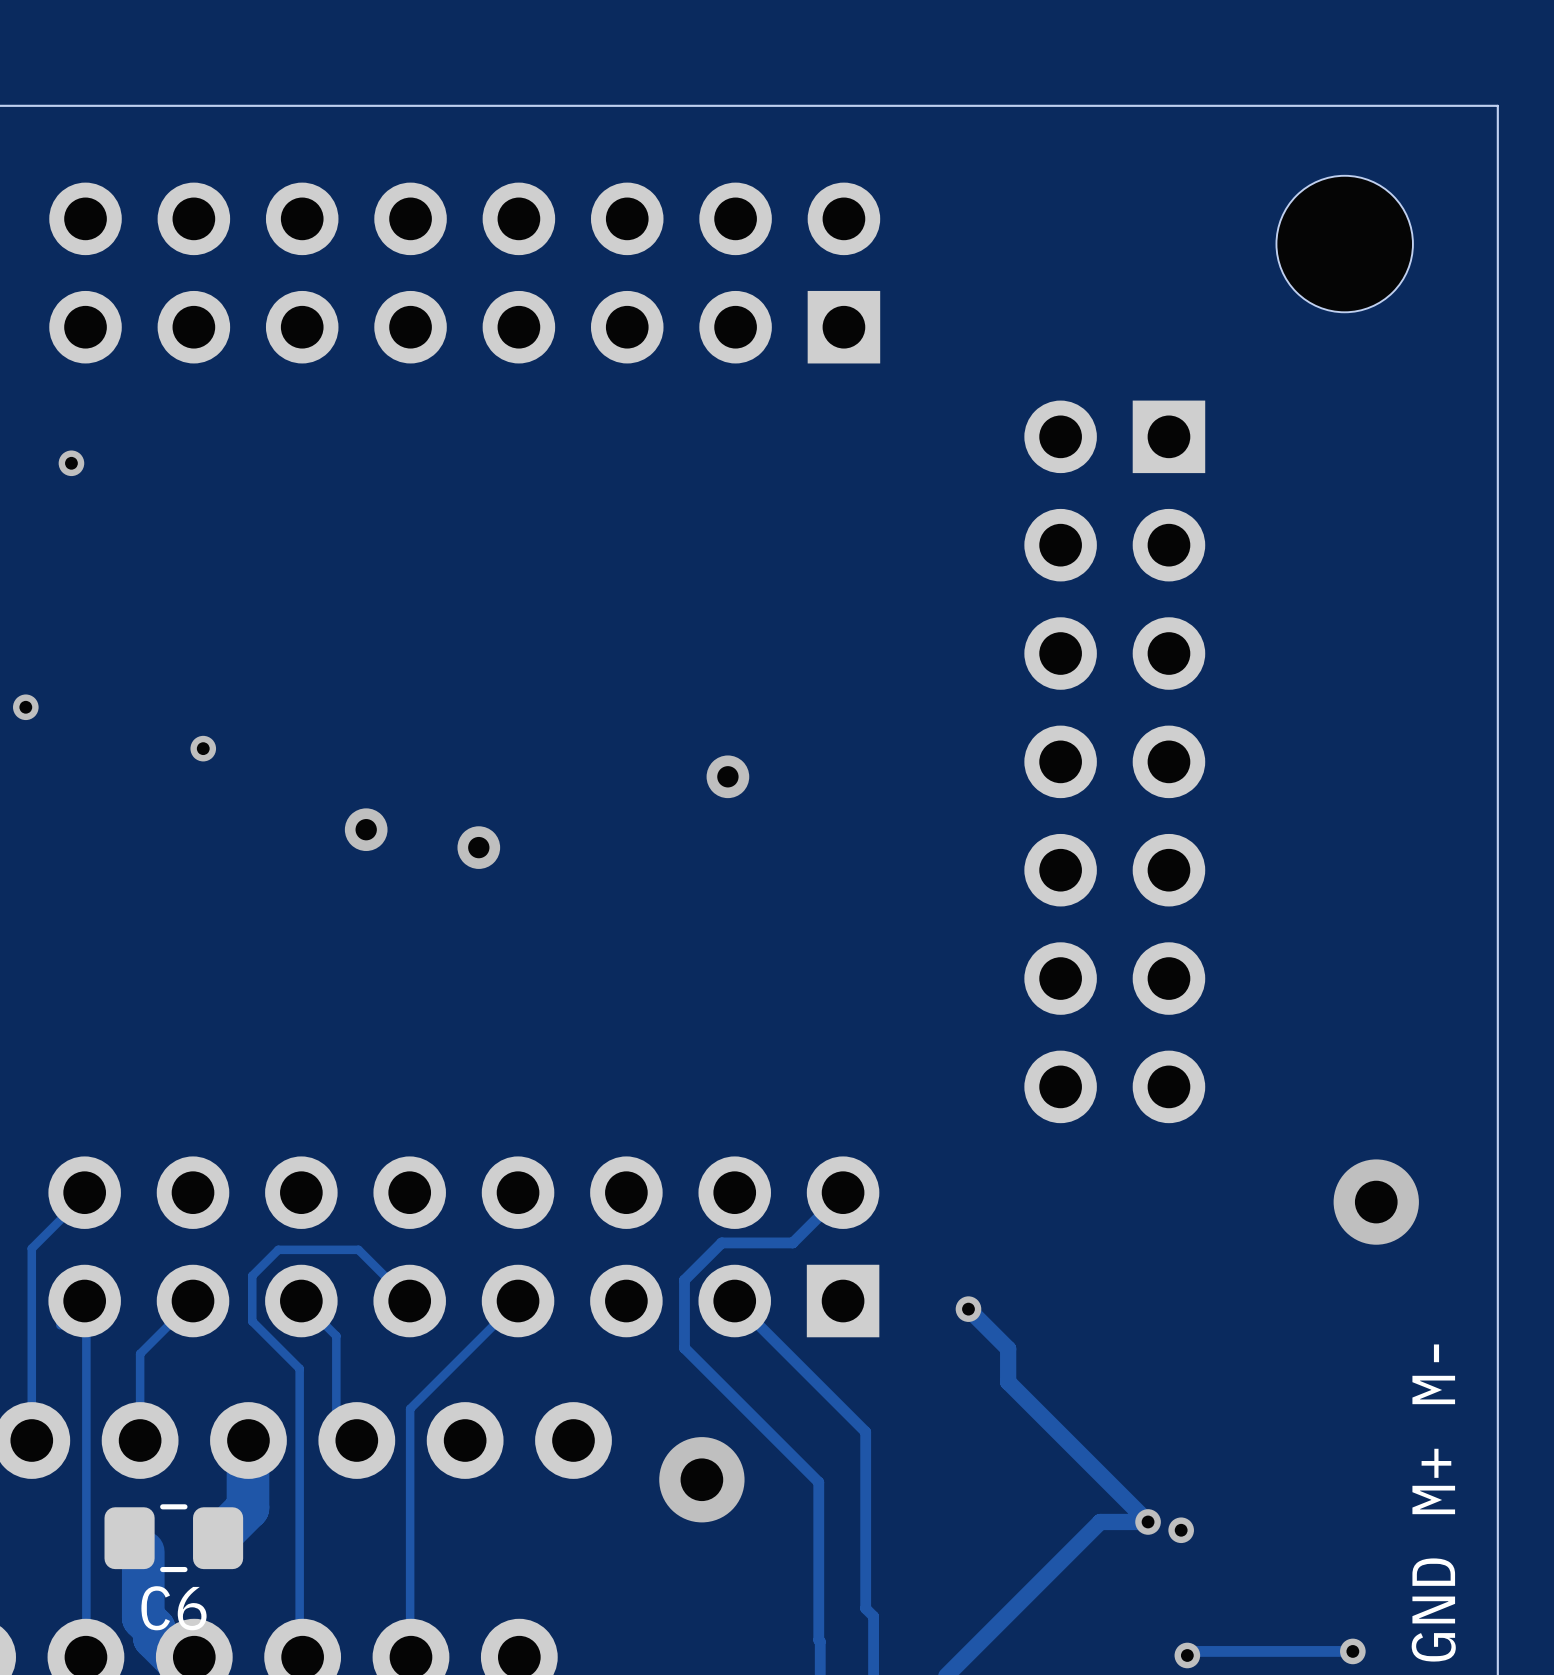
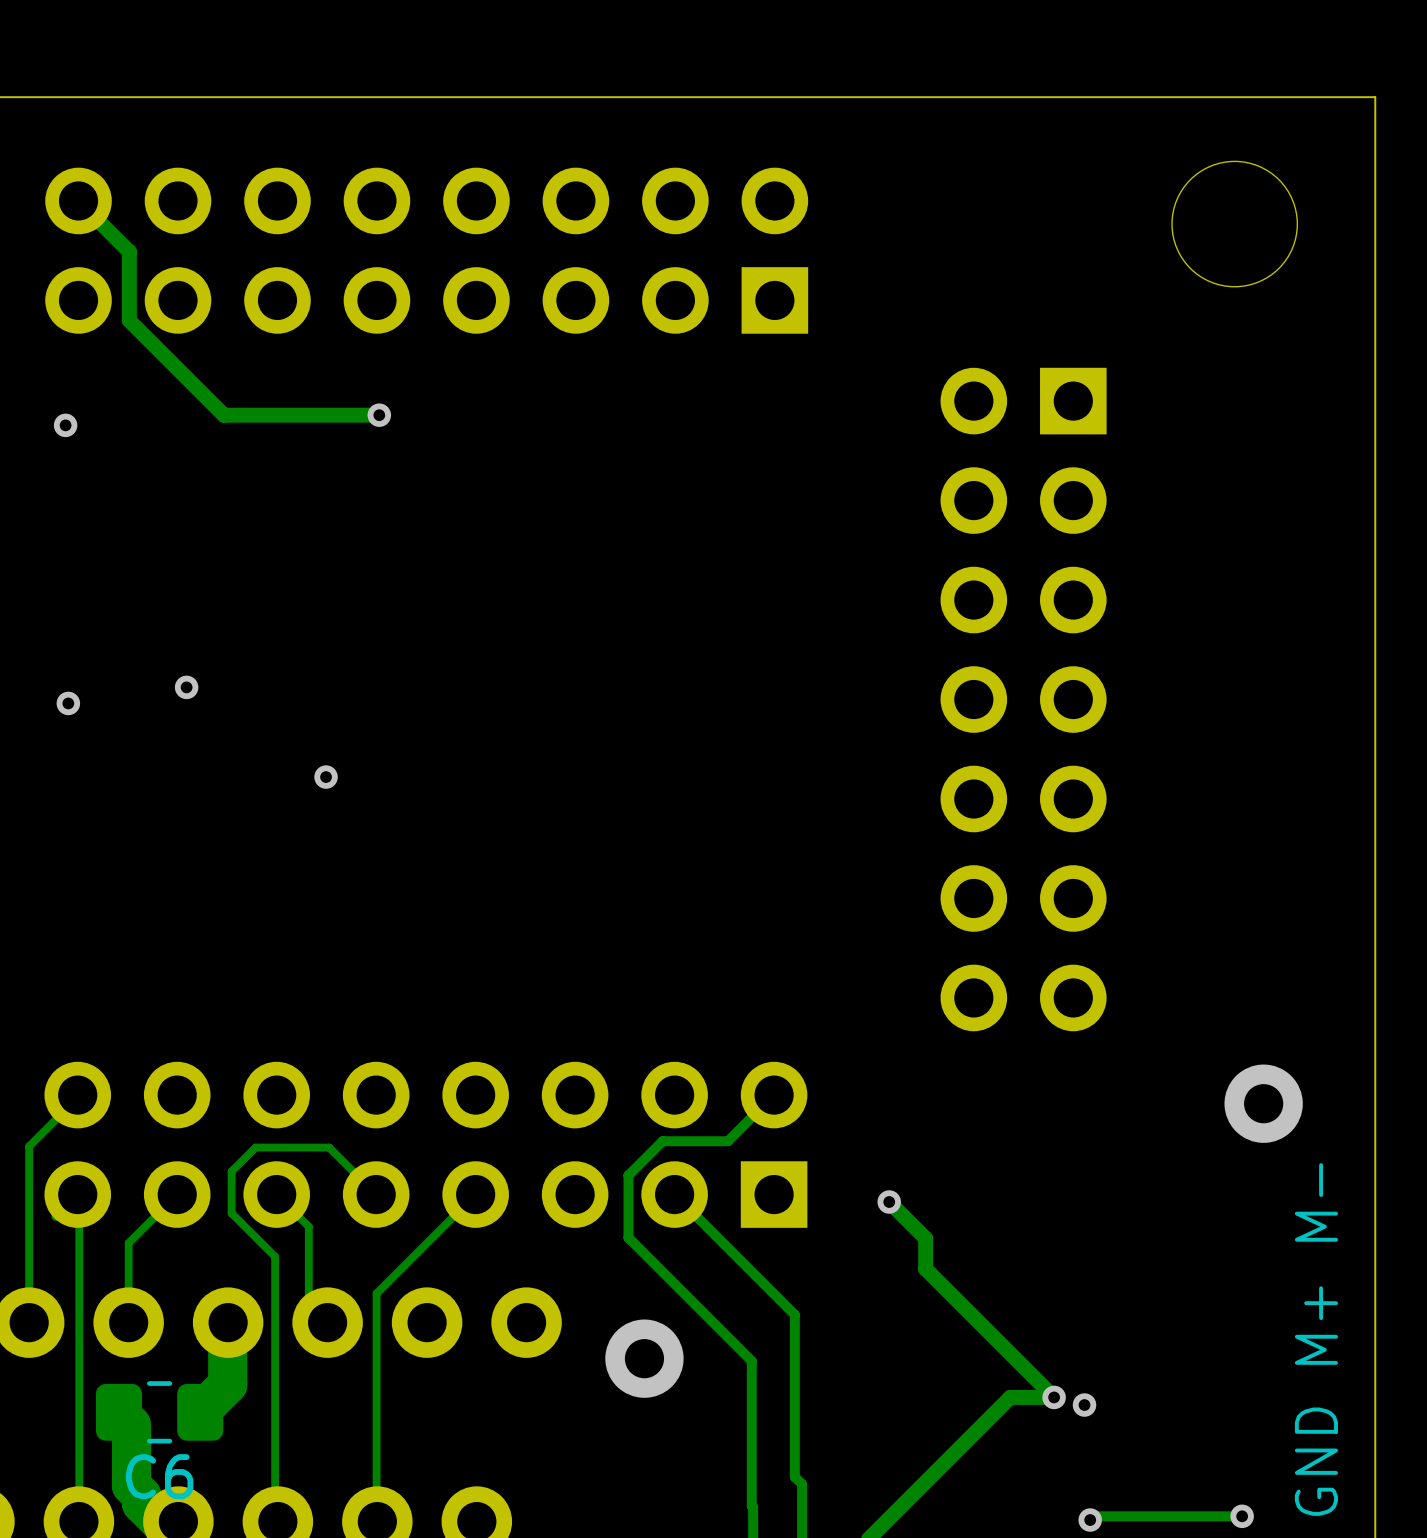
track: none -> (78, 200) (129, 251) (129, 320) (223, 415) (379, 415)
via: none -> (379, 415)
via position: (25, 707) -> (68, 703)
via: (727, 776) -> none
via size: [344, 808, 388, 852] -> [314, 765, 338, 789]
via: (478, 847) -> none

